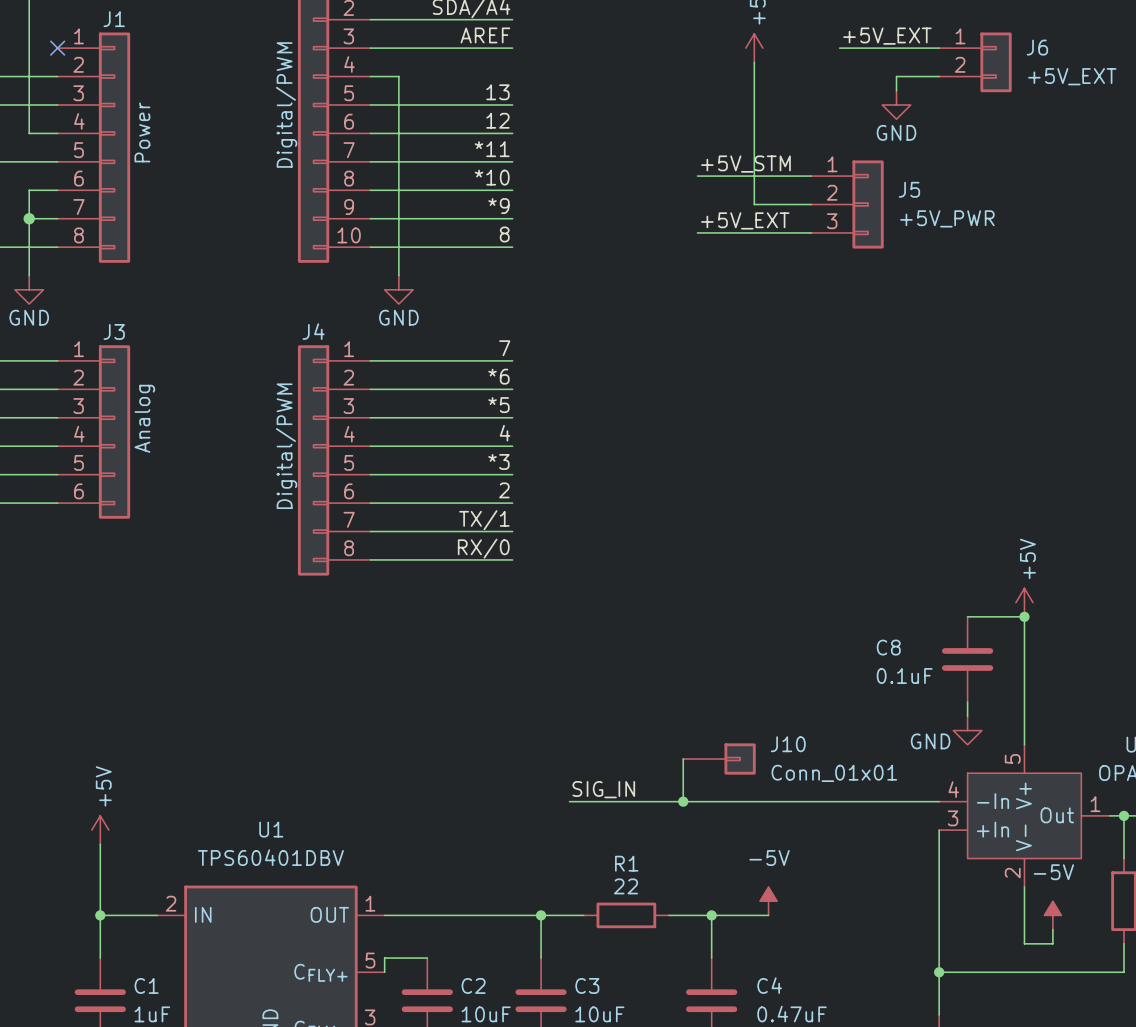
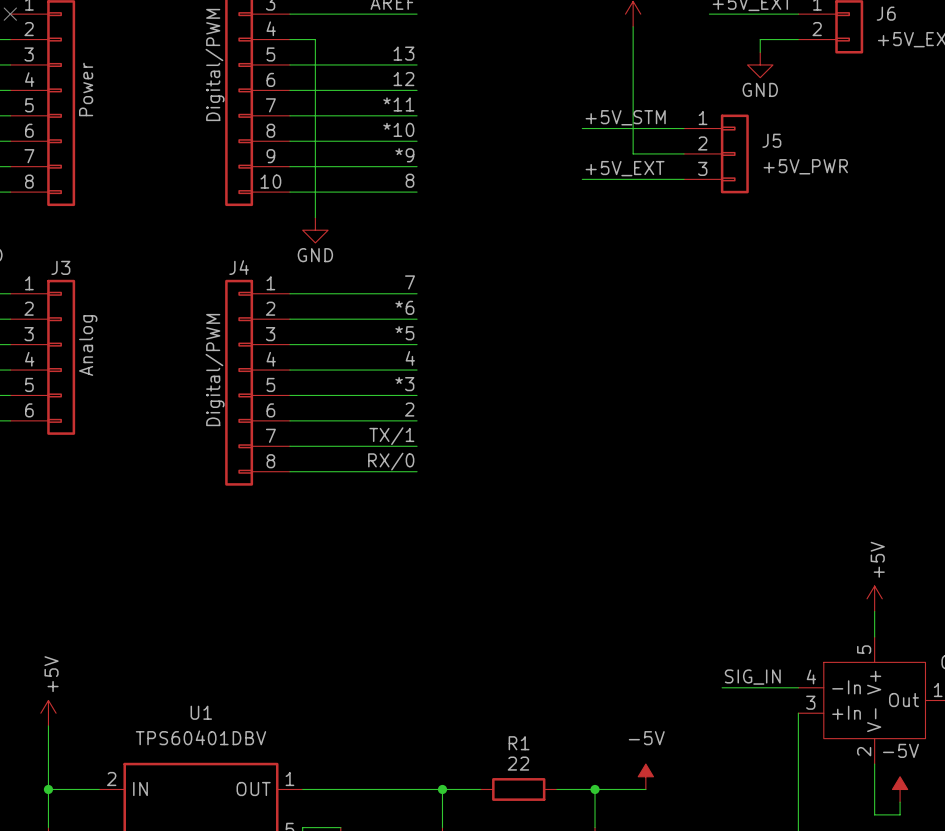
power symbol position: +5V (1024, 602) -> +5V (874, 598)
wire: (967, 616) (1024, 616) (1024, 716) -> none
junction: (1024, 616) -> none
C8: 0.1uF (967, 659) -> none
wire: (967, 702) (967, 716) -> none
power symbol: GND (967, 730) -> none
wire: (683, 759) (683, 801) -> none
J10: Conn_01x01 (719, 759) -> none
label: SIG_IN (603, 789) -> none
label: none -> SIG_IN (752, 677)
wire: (569, 801) (853, 801) -> none
junction: (683, 801) -> none

